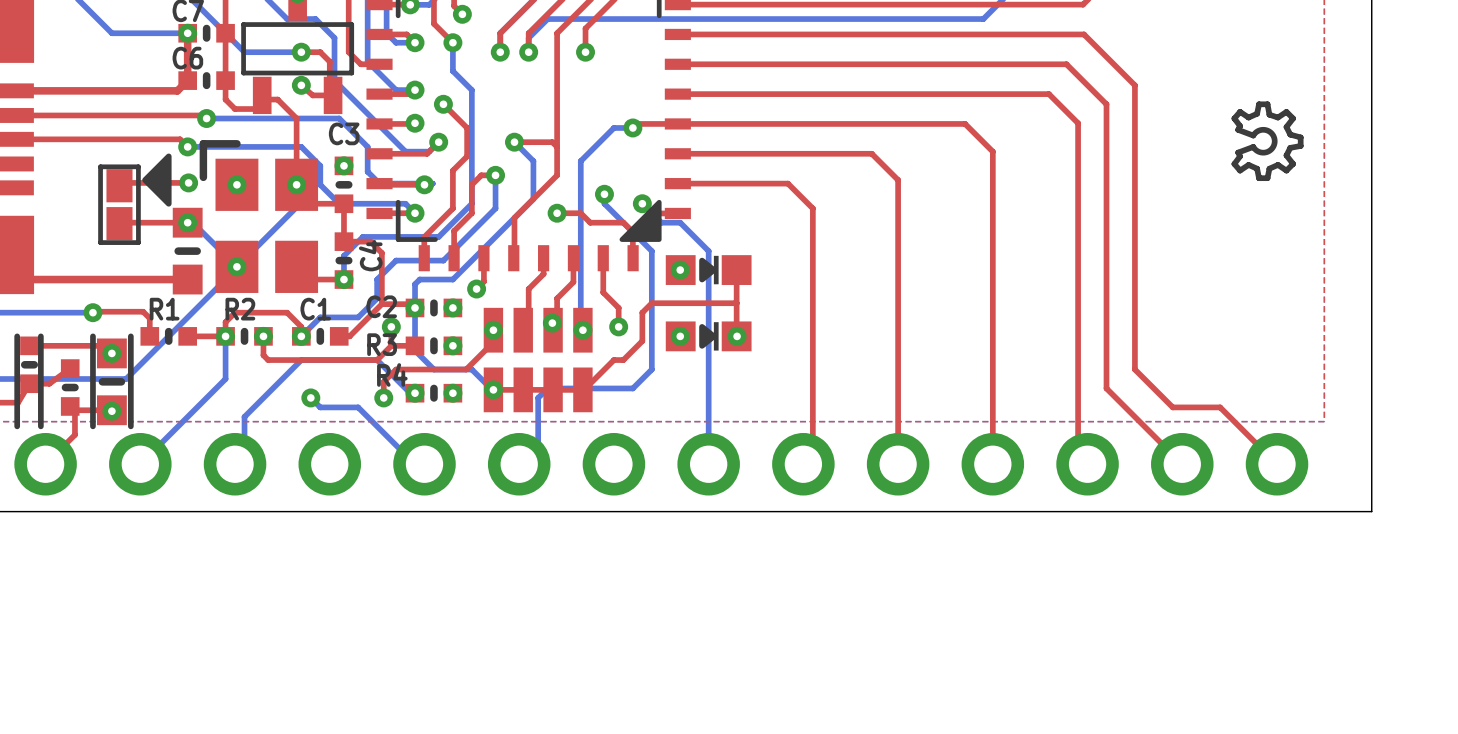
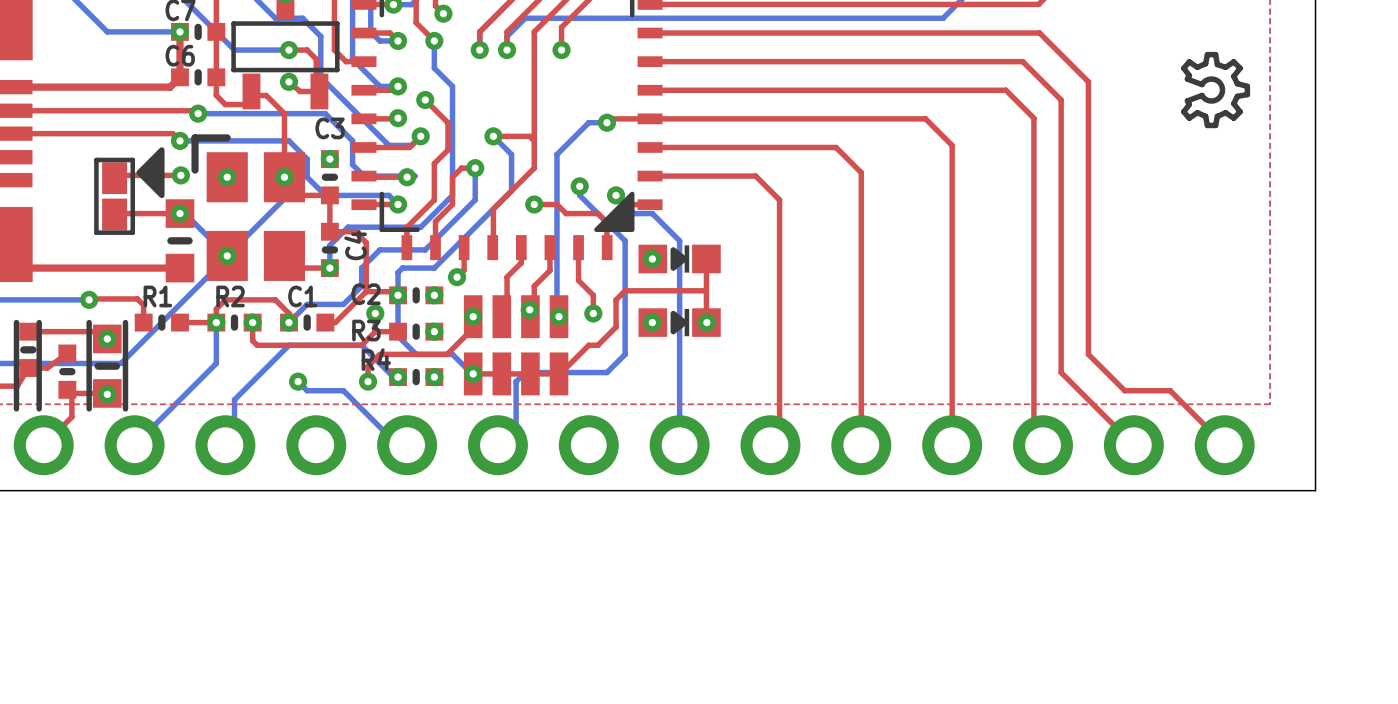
drawing position: (1267, 141) -> (1215, 90)

